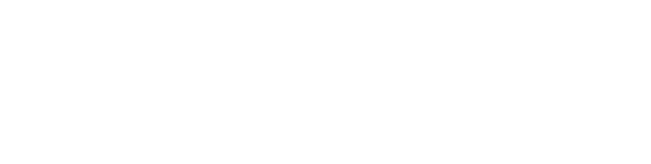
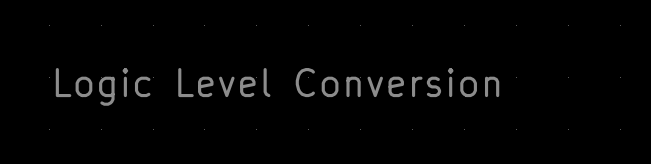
text: none -> Logic Level Conversion (277, 86)

